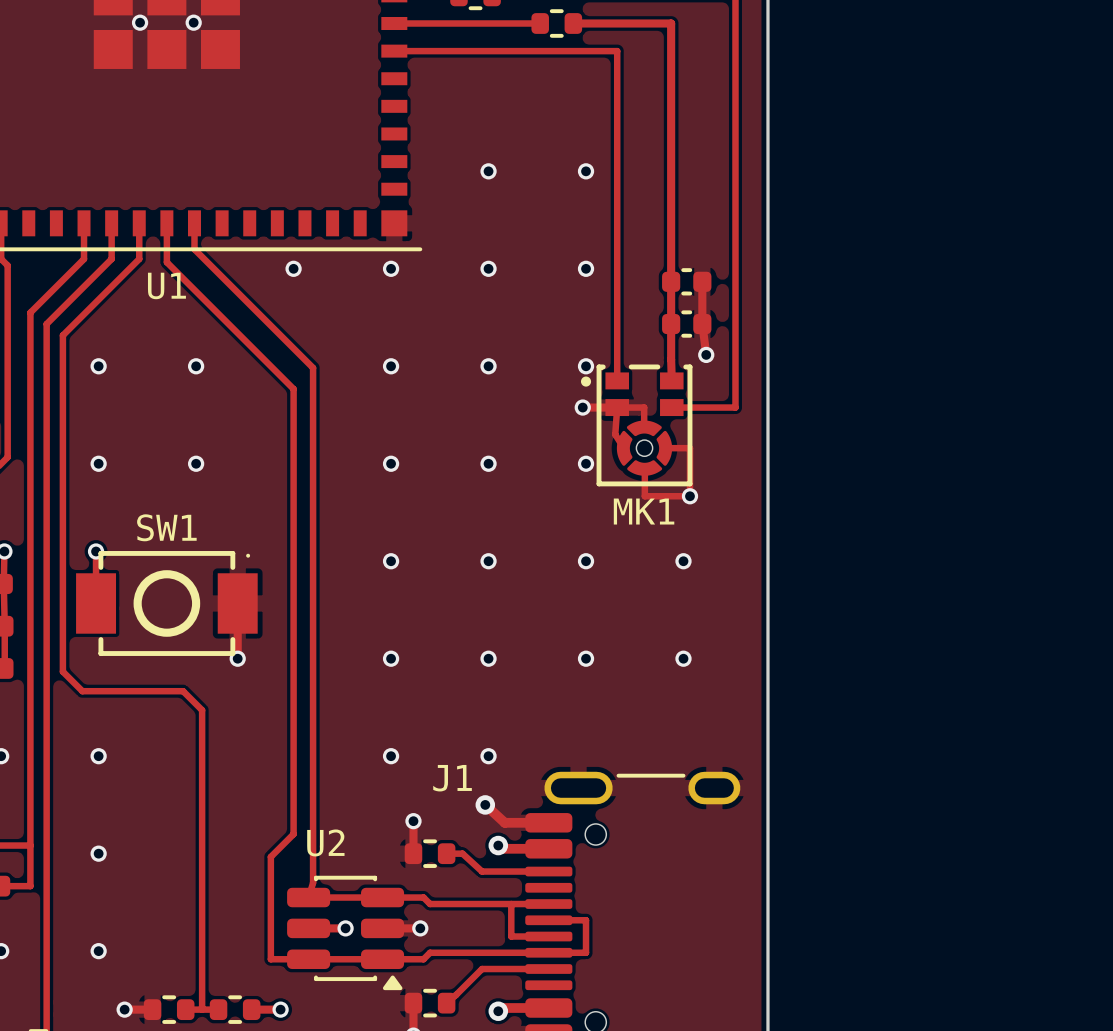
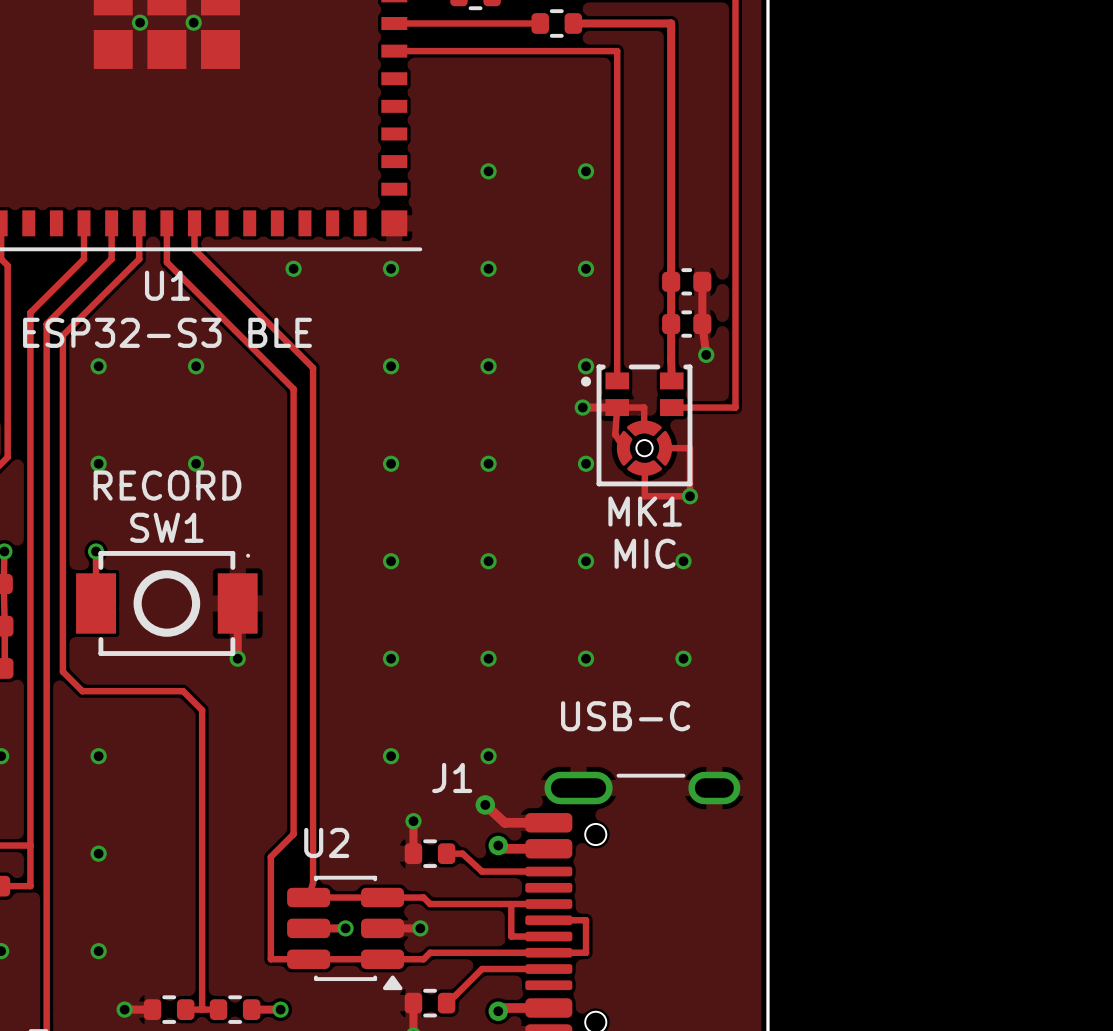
text: none -> ESP32-S3 BLE (167, 332)
text: none -> RECORD (167, 485)
text: none -> MIC (645, 553)
text: none -> USB-C (625, 716)

